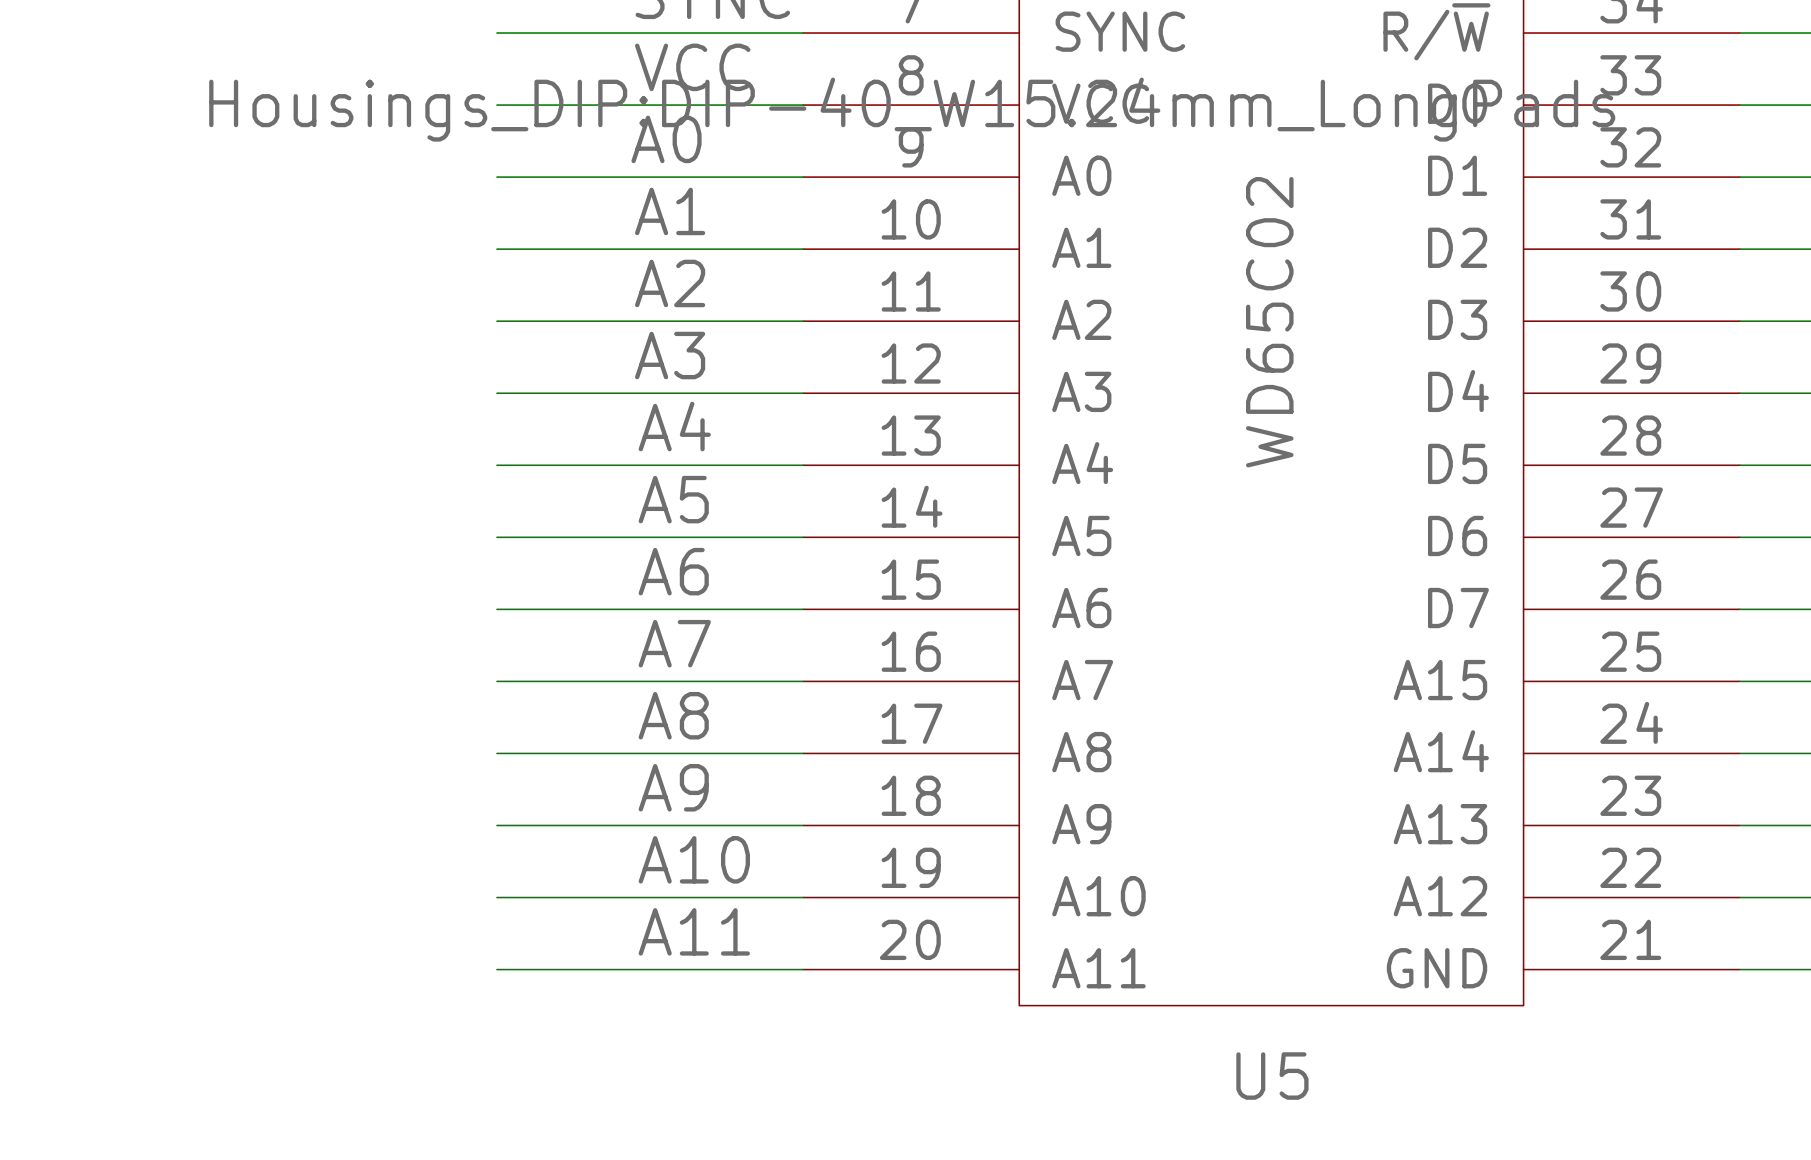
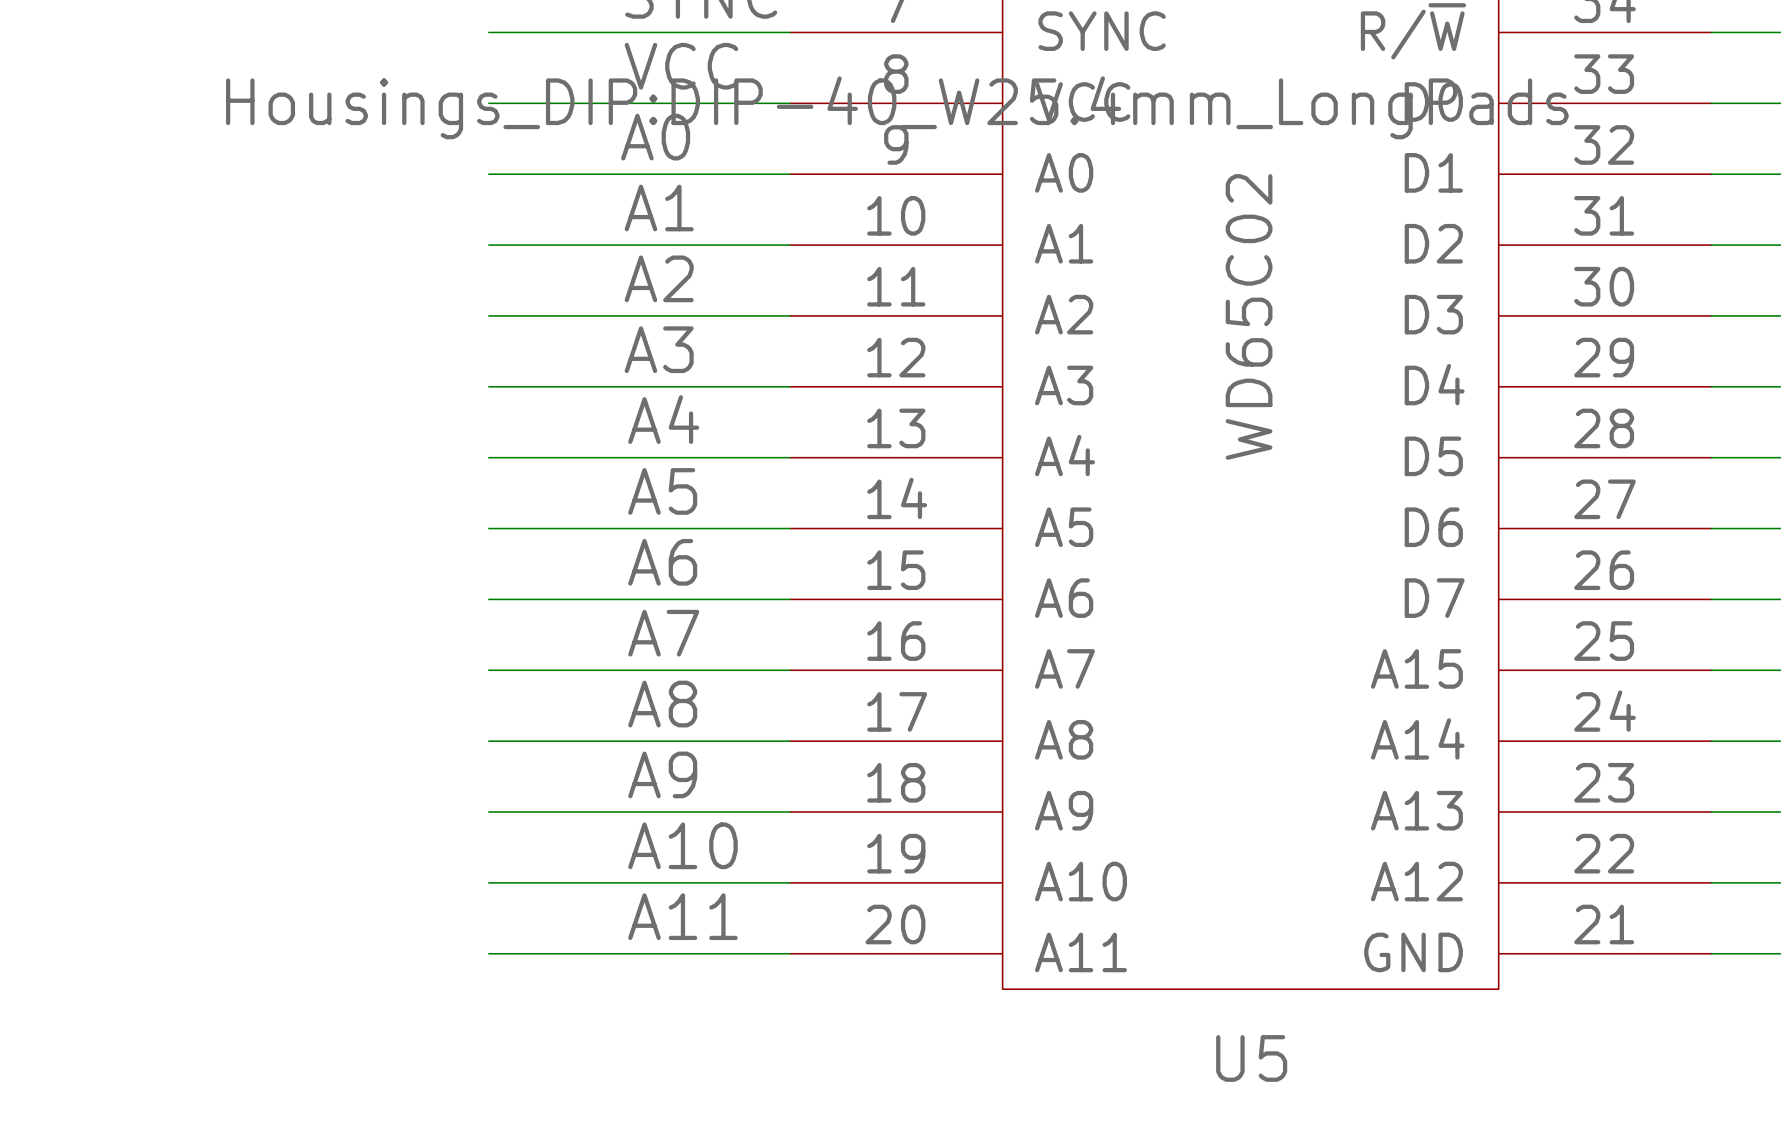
U5 text: Housings_DIP:DIP-40_W15.24mm_LongPads (912, 109) -> Housings_DIP:DIP-40_W25.4mm_LongPads (897, 107)

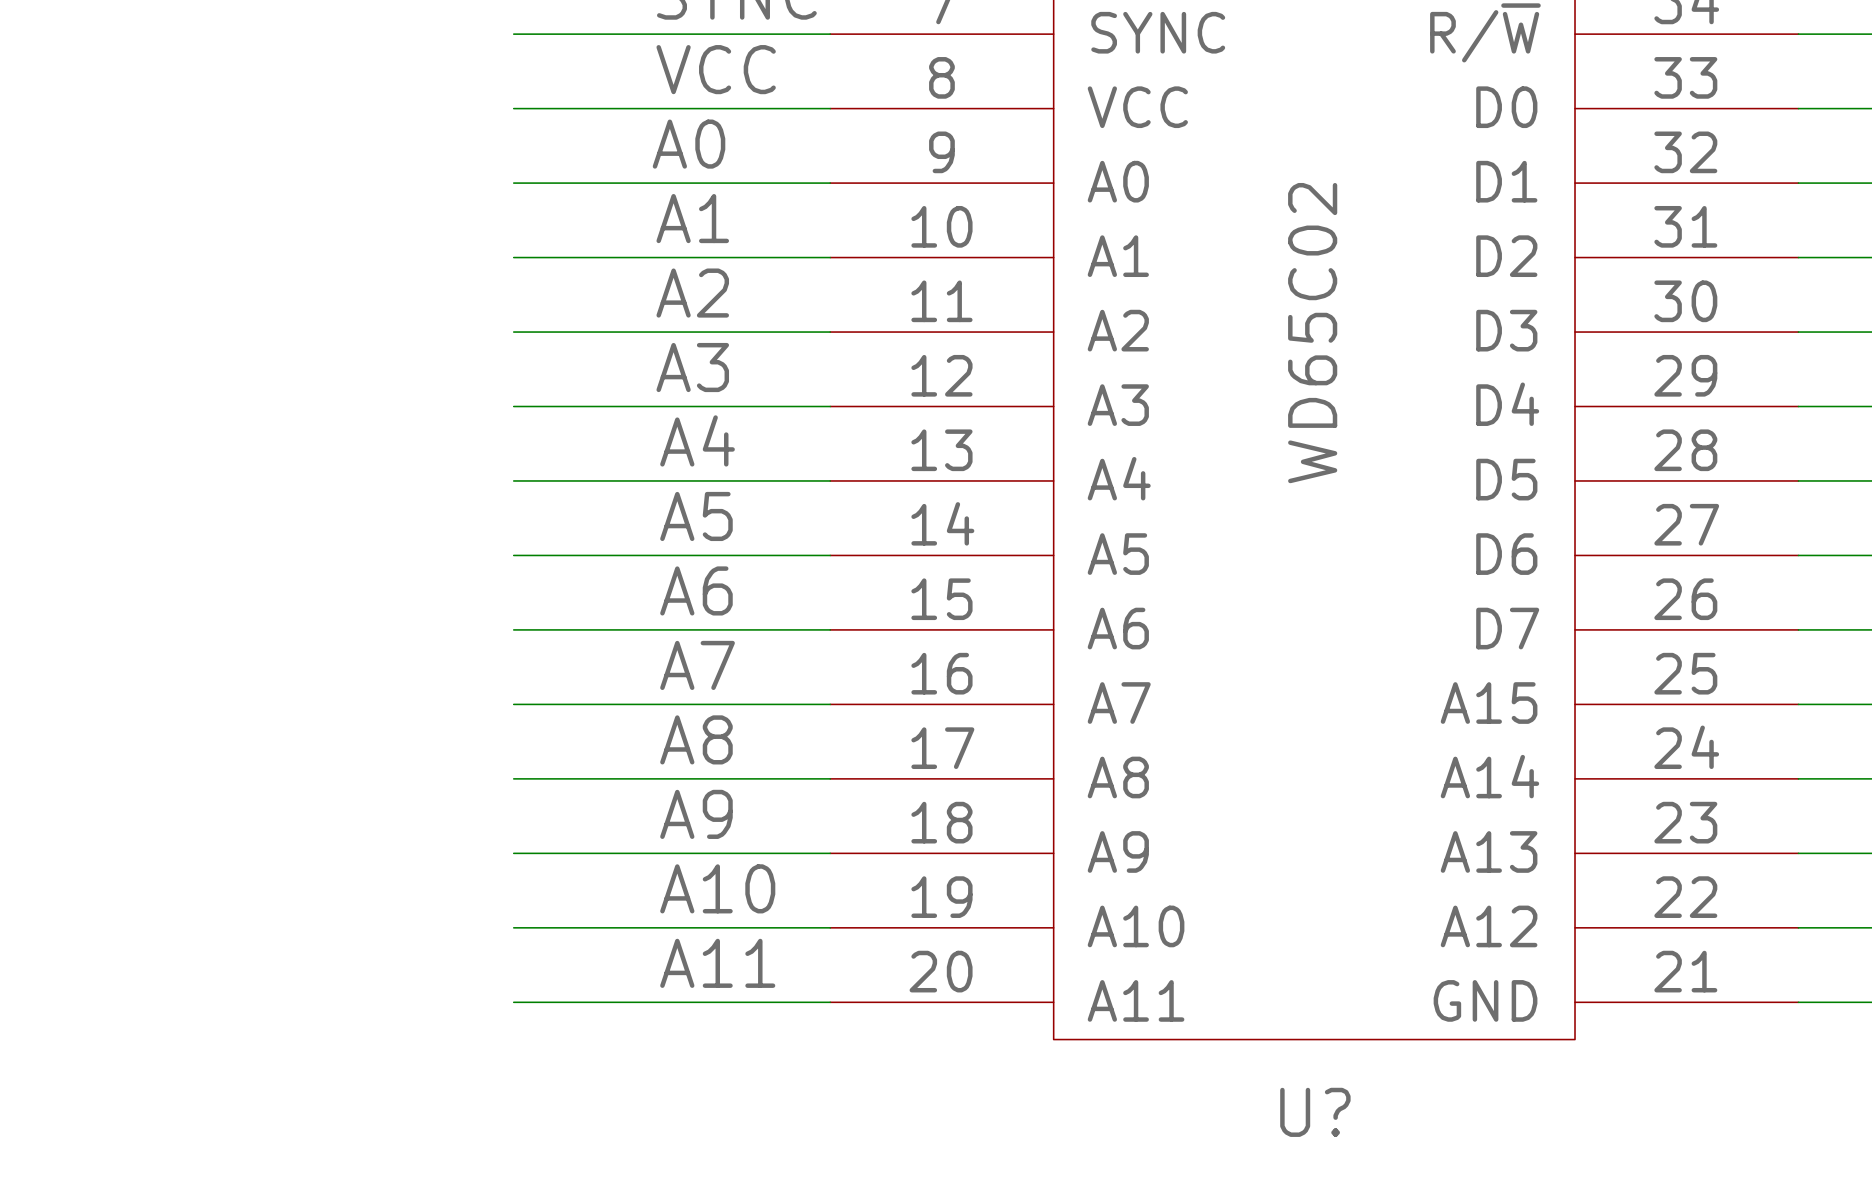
U5 text: Housings_DIP:DIP-40_W25.4mm_LongPads (897, 107) -> none
U5 name: U5 (1251, 1058) -> U? (1315, 1112)

